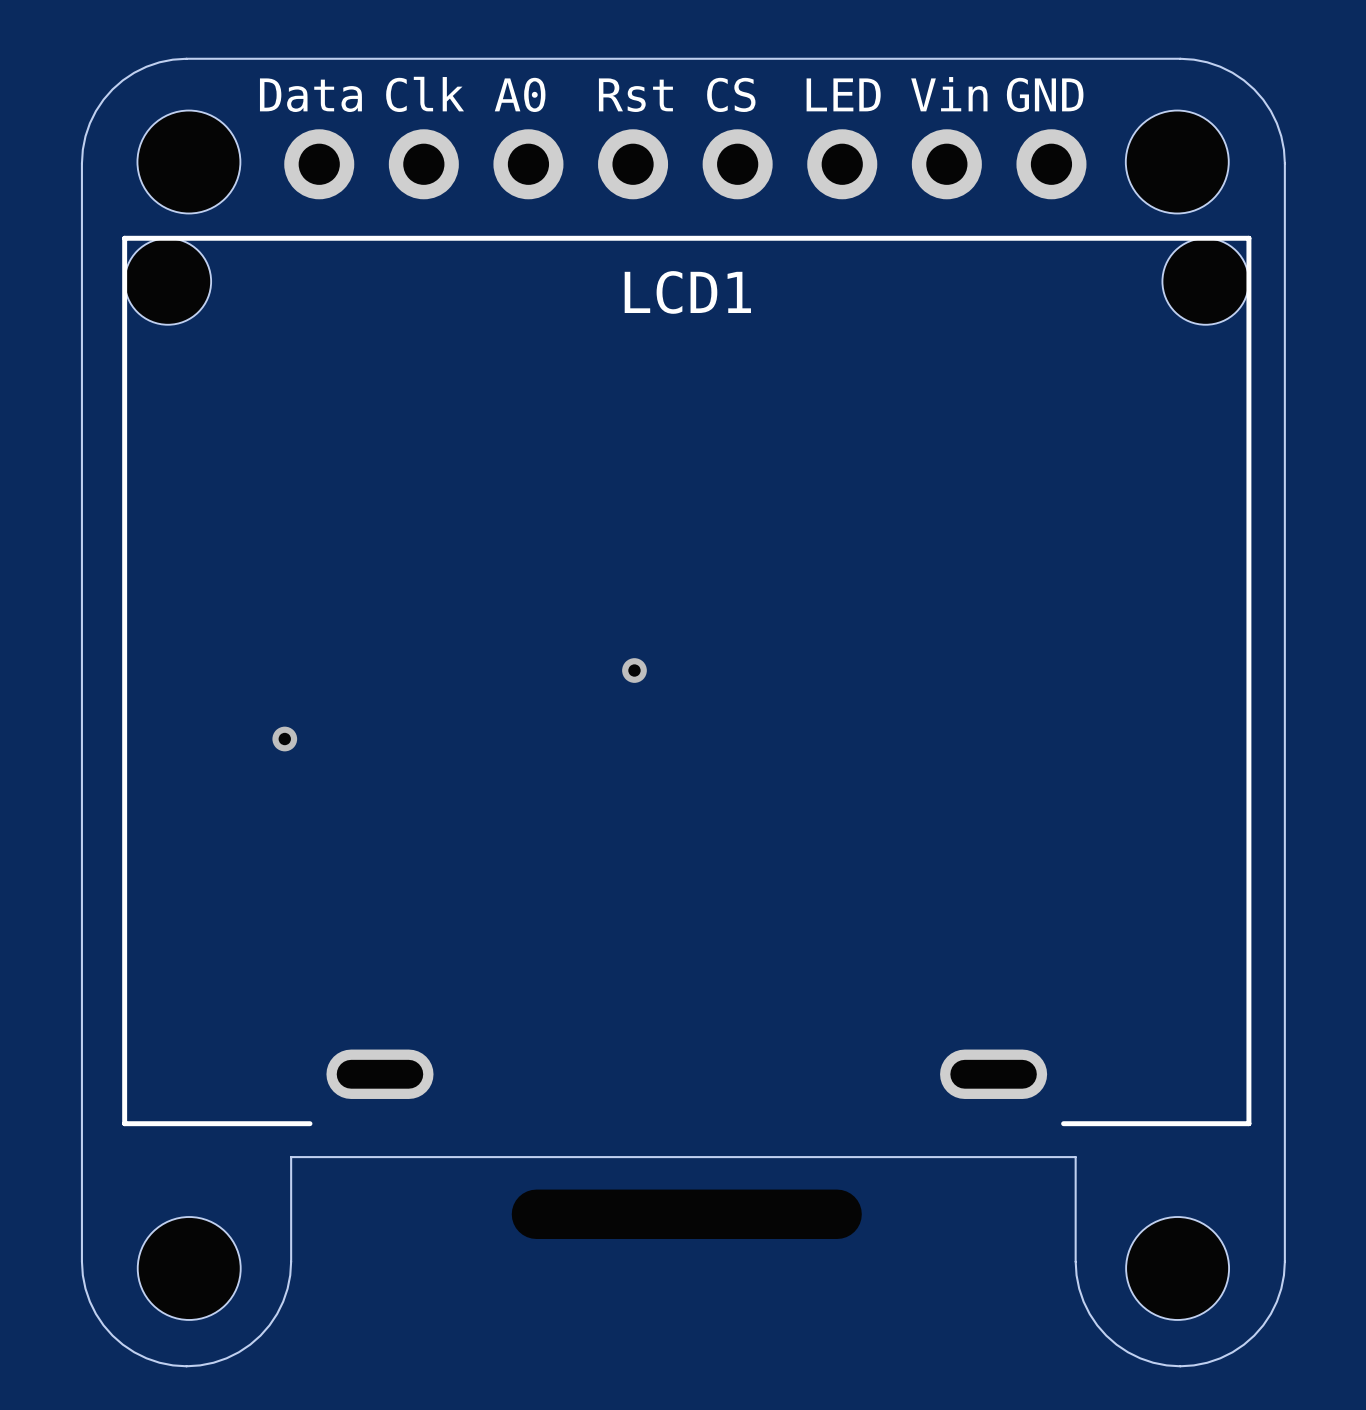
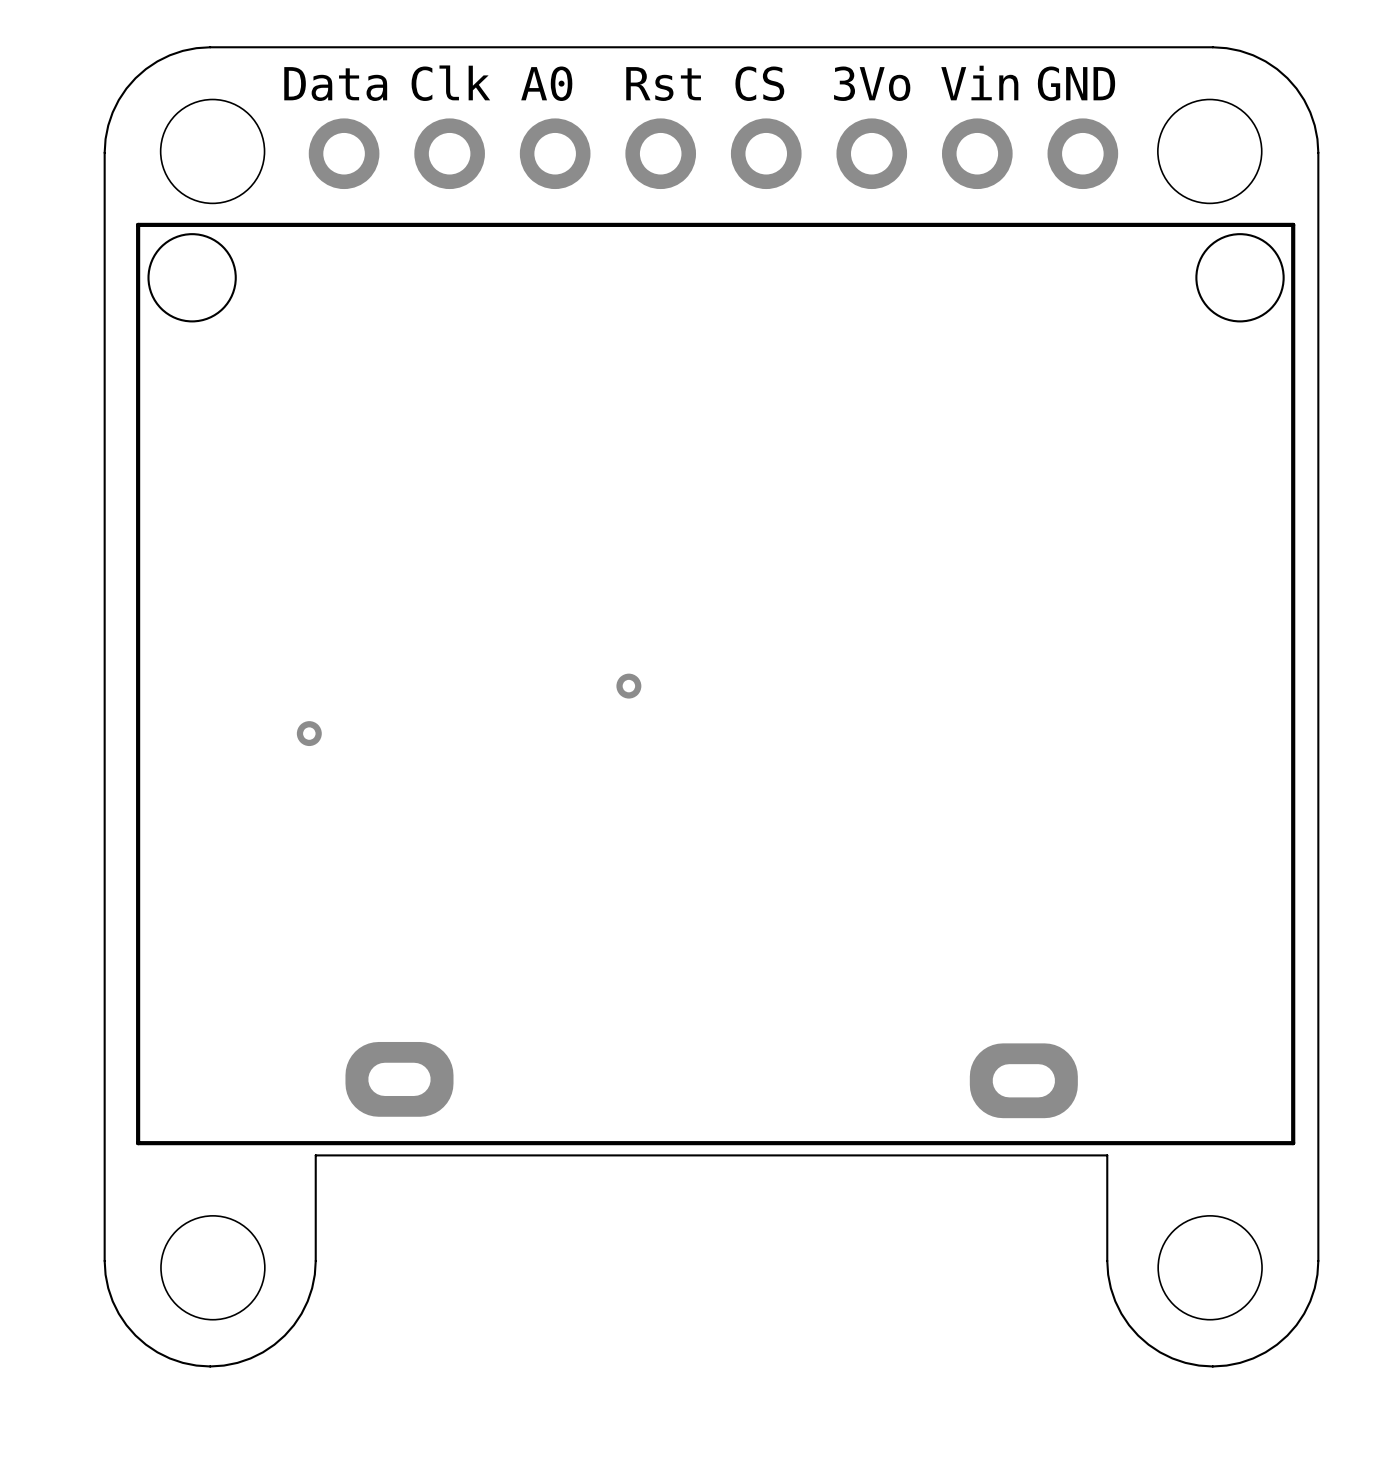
text: LED (843, 94) -> 3Vo (872, 83)
line: none -> (138, 224) (1293, 224) (1293, 1143) (138, 1143) (138, 224)
round board edge: none -> [147, 233, 237, 323]
round board edge: none -> [1195, 233, 1285, 323]
via position: (634, 670) -> (628, 686)
LCD1: (686, 737) -> none
part: none -> (399, 1079)
part: none -> (1023, 1080)

